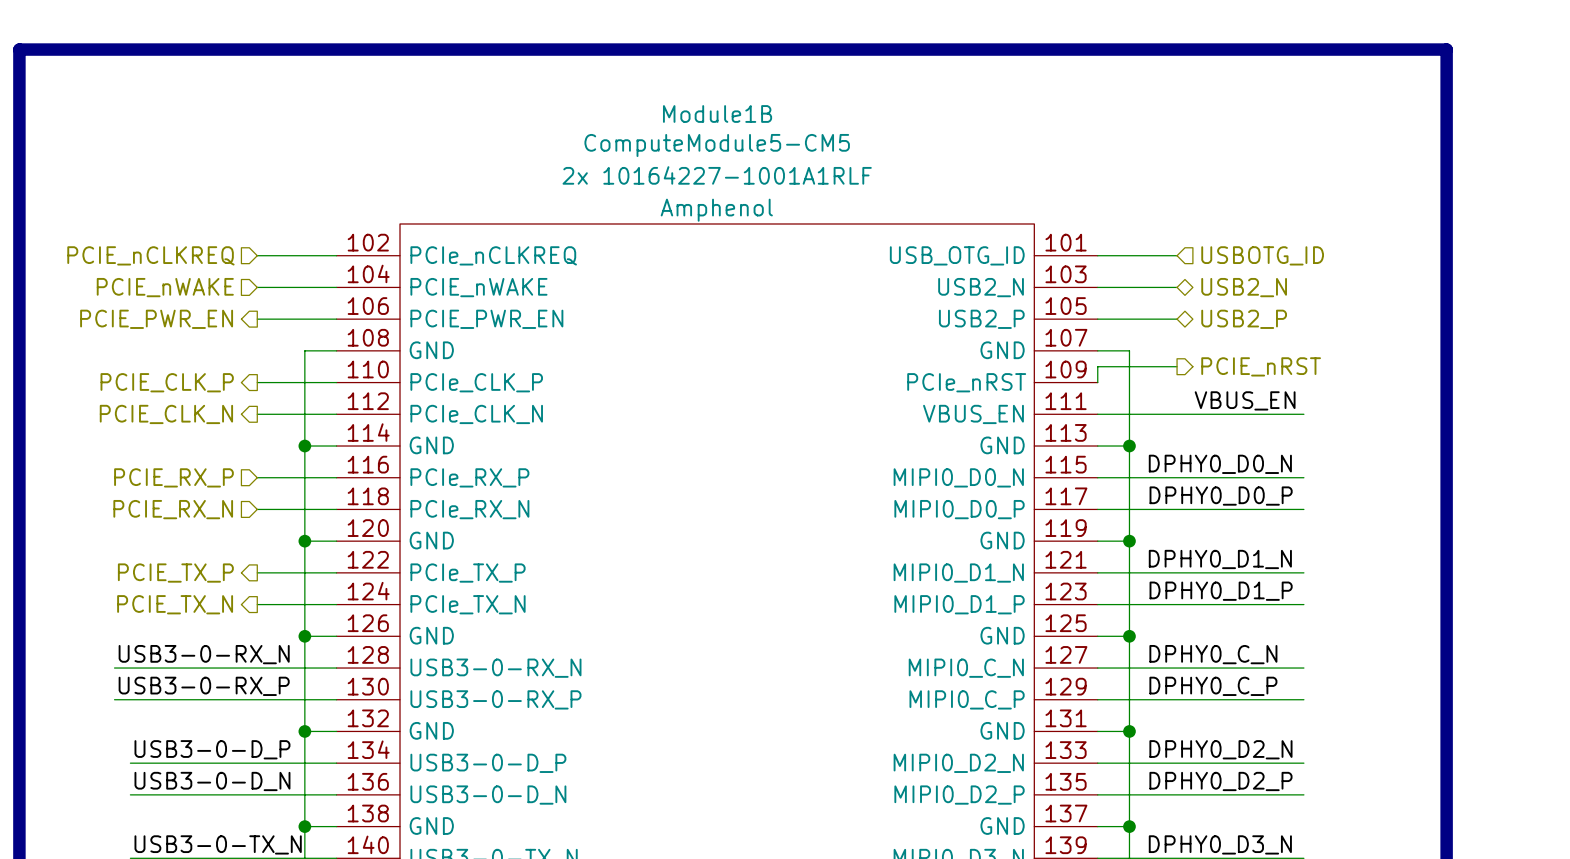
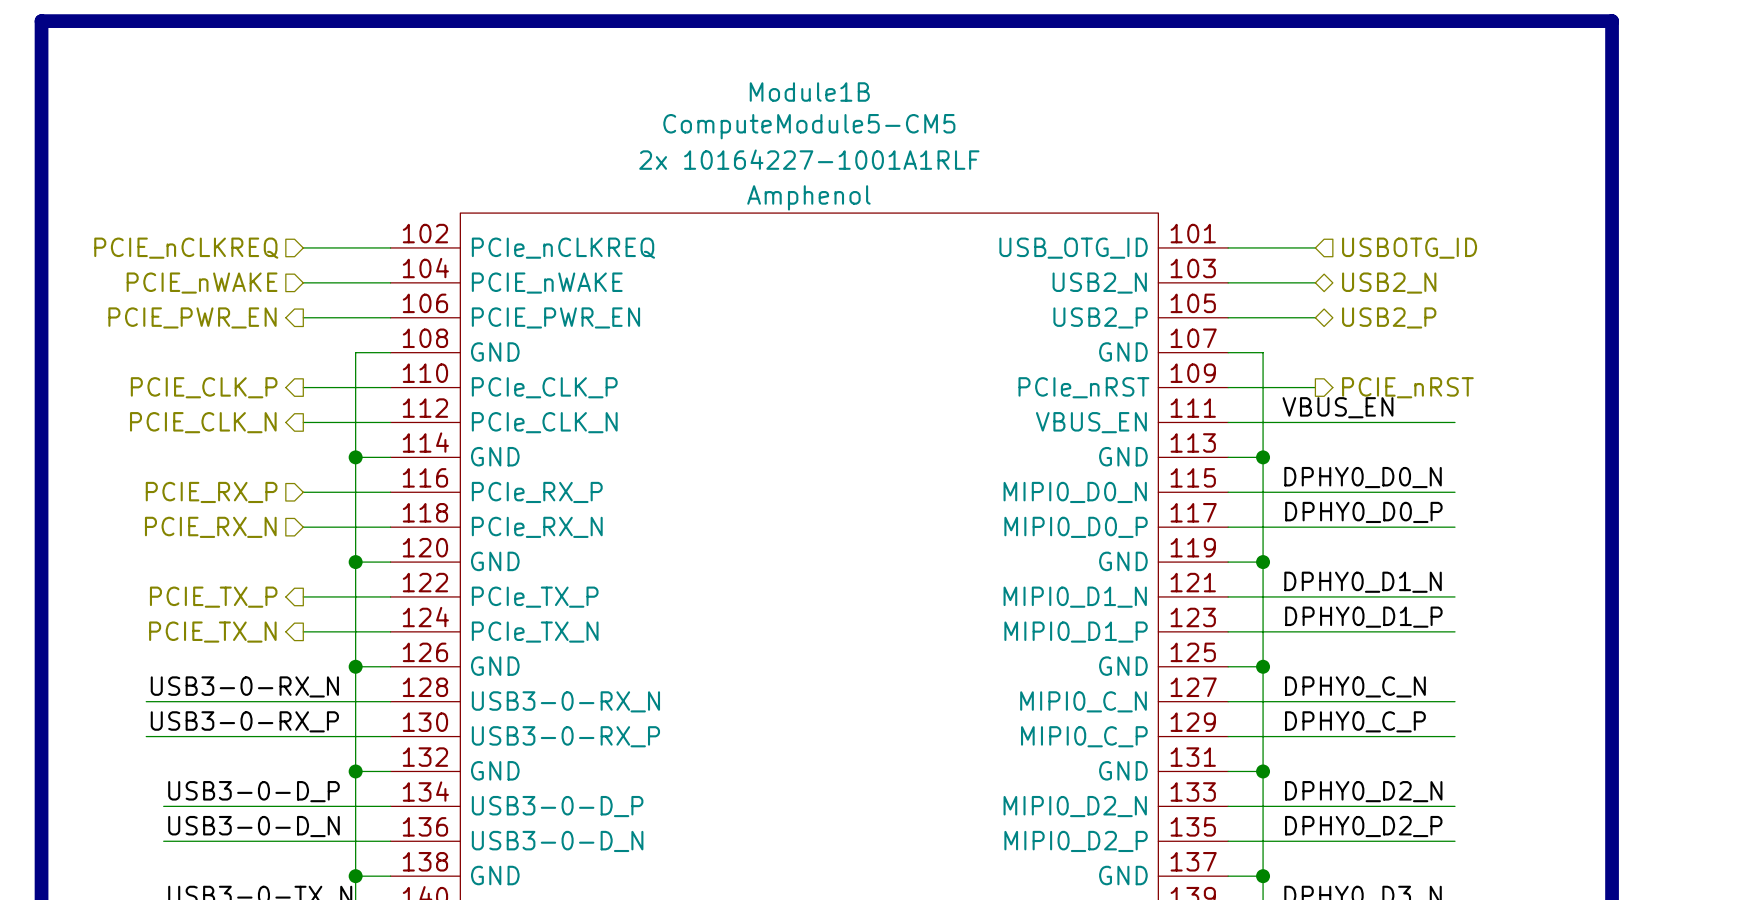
wire: (1177, 366) (1097, 366) (1097, 382) -> (1315, 387) (1228, 387)
hierarchical label position: PCIE_nRST (1261, 366) -> PCIE_nRST (1407, 387)
label position: VBUS_EN (1245, 400) -> VBUS_EN (1337, 407)

